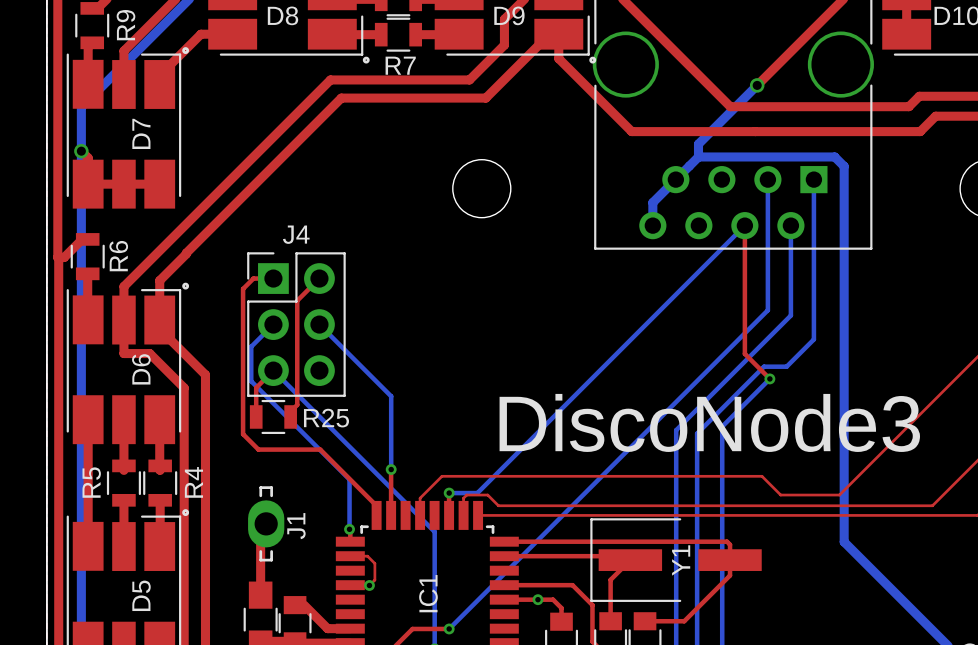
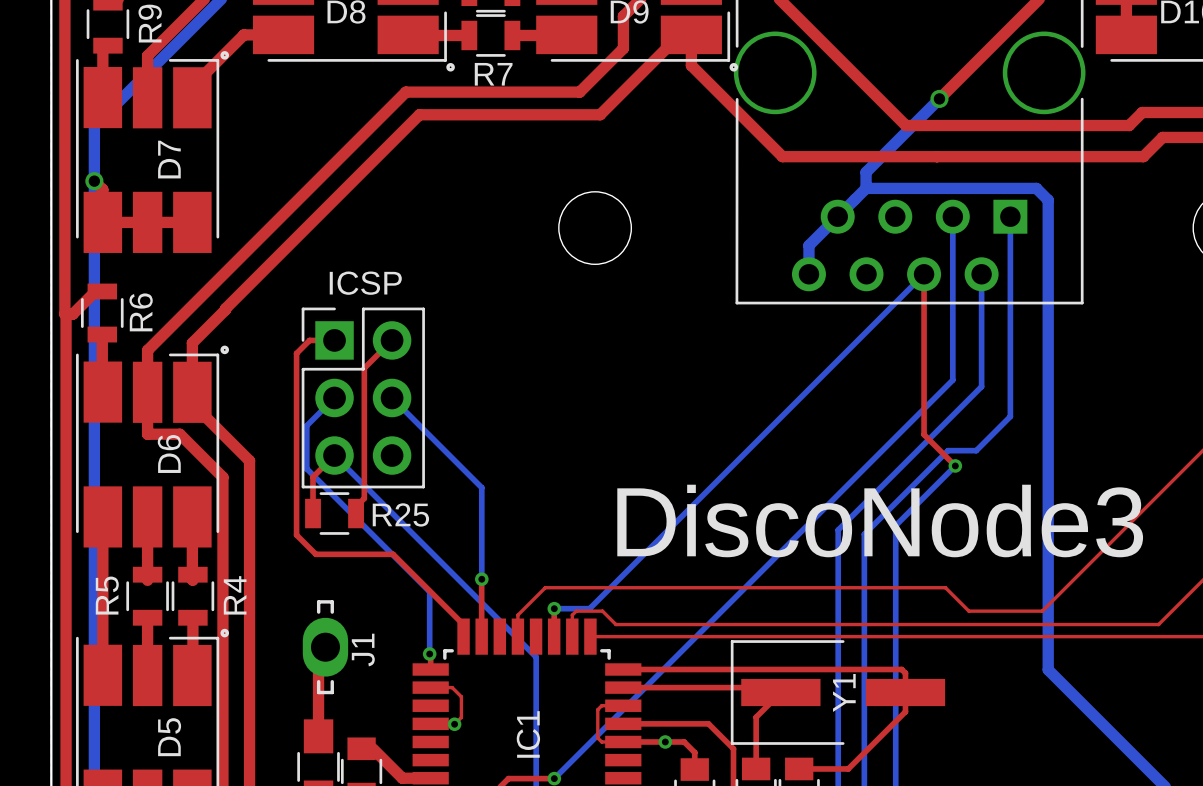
text: none -> ICSP (365, 283)
J4 name: J4 (296, 234) -> none
top track: none -> (623, 705) (601, 705) (597, 709) (597, 738) (601, 741) (623, 741)

